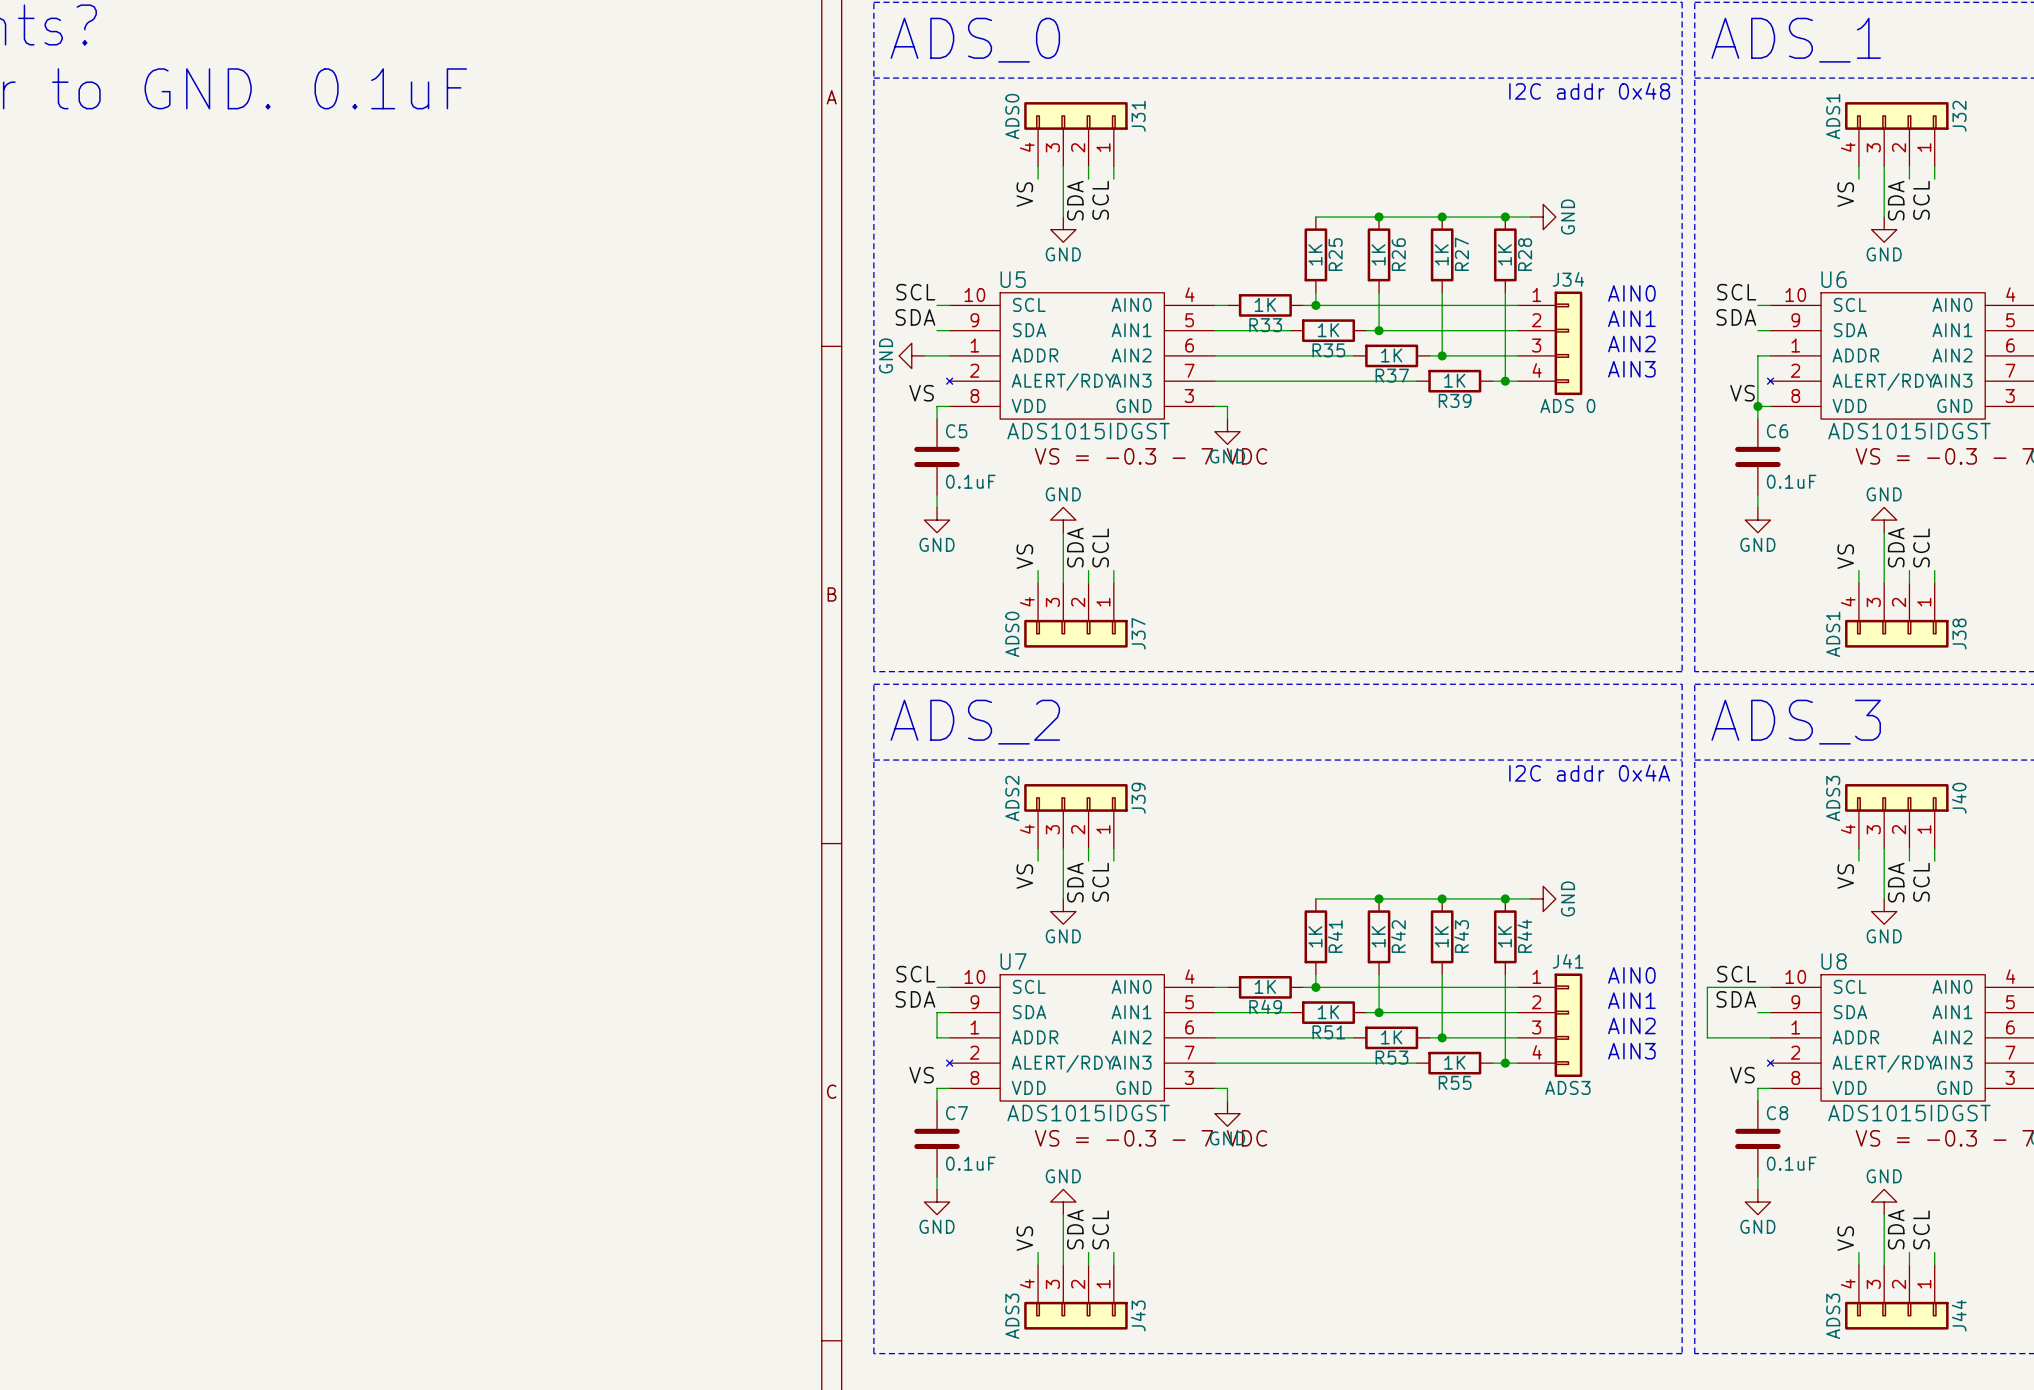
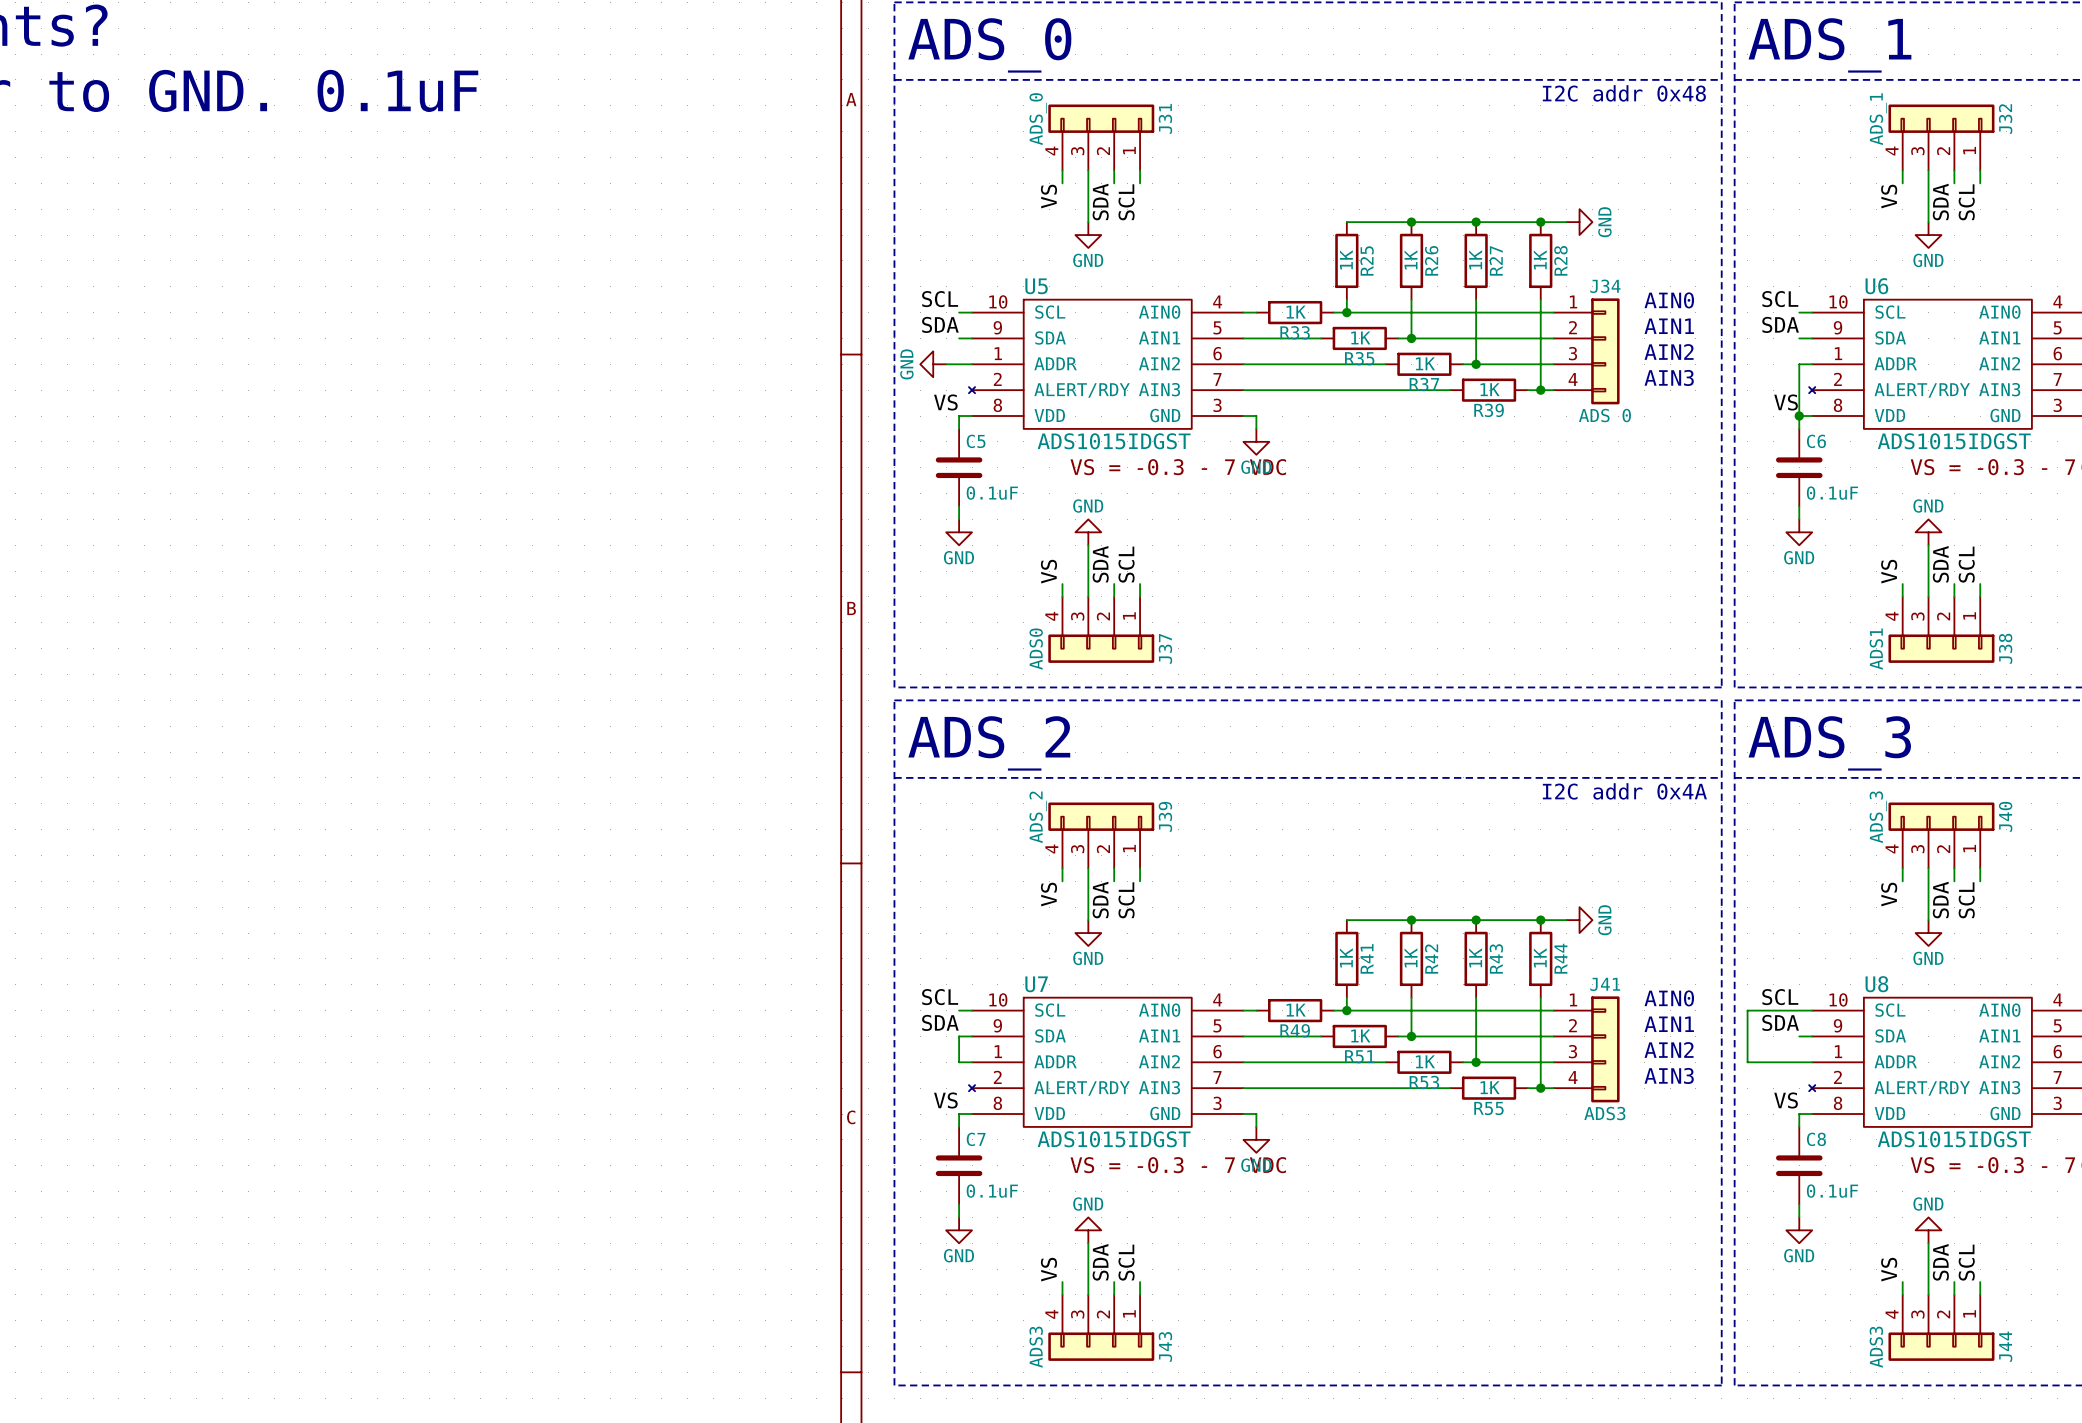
J31 value: ADS0 (1012, 116) -> ADS_0 (1038, 119)
J32 value: ADS1 (1833, 116) -> ADS_1 (1878, 119)
J39 value: ADS2 (1012, 798) -> ADS_2 (1038, 817)
J40 value: ADS3 (1833, 798) -> ADS_3 (1878, 817)

